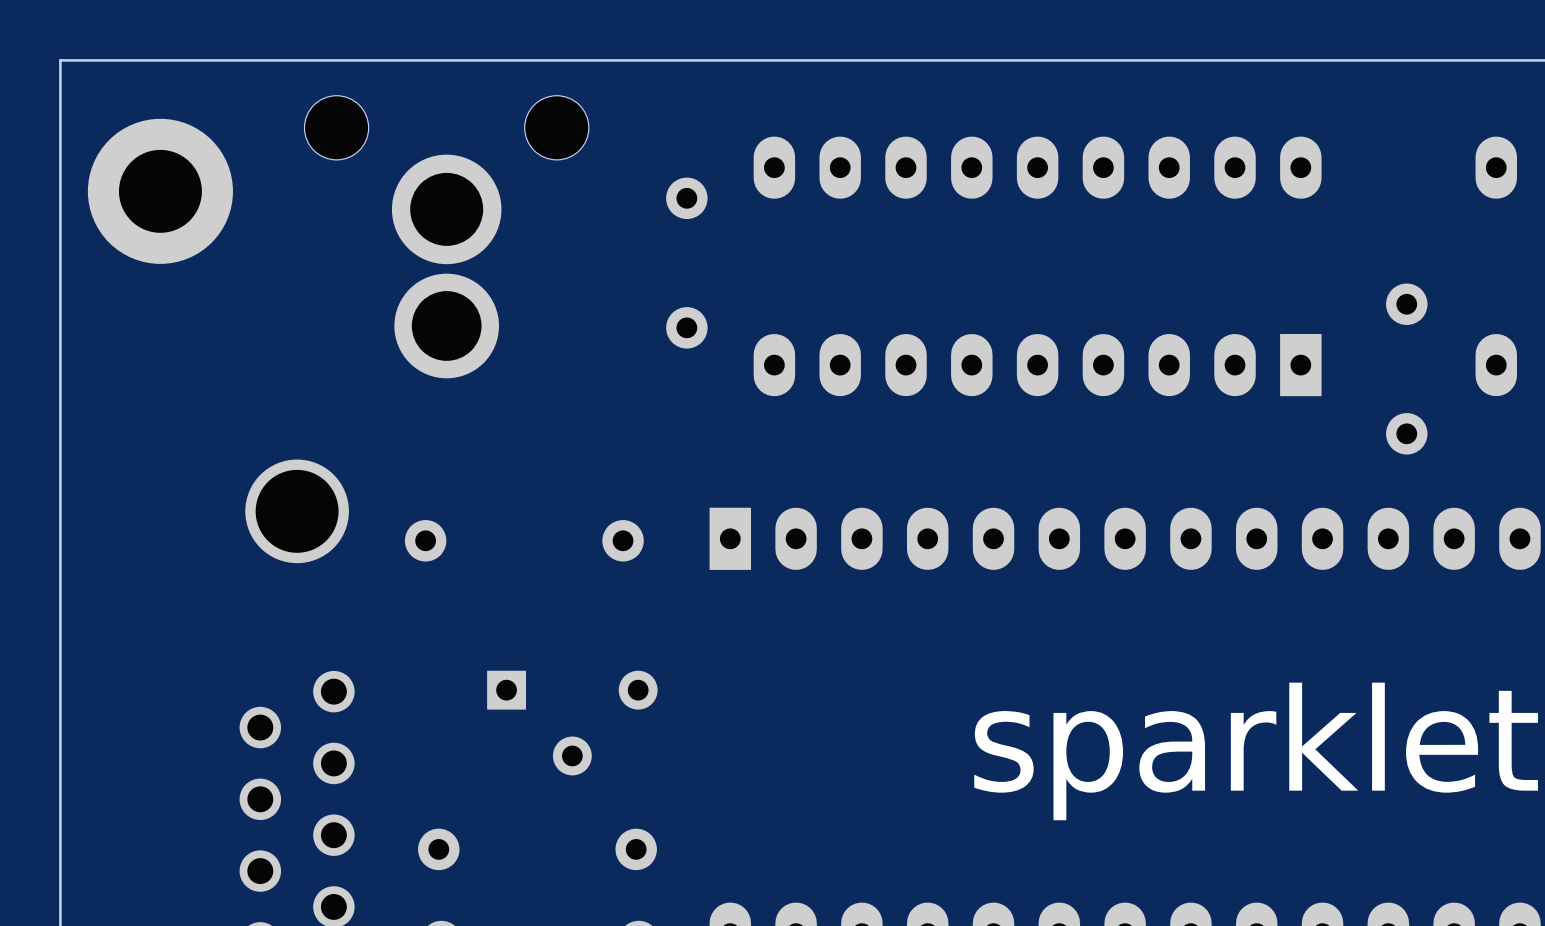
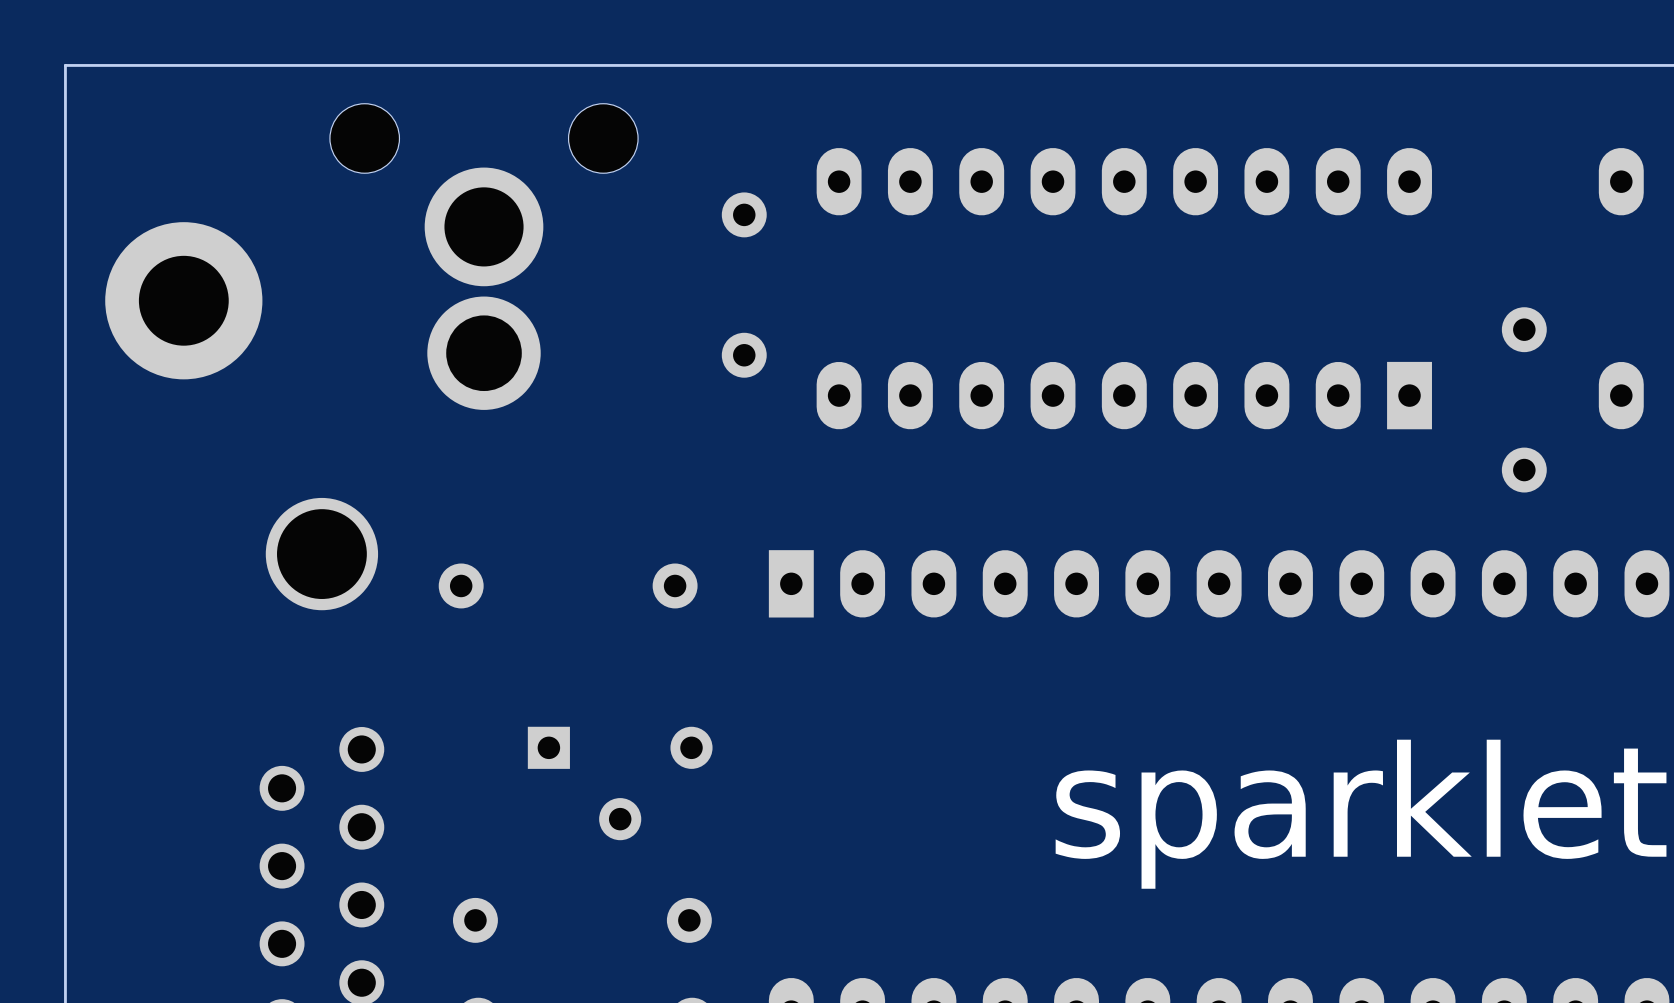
part position: (160, 191) -> (183, 300)

